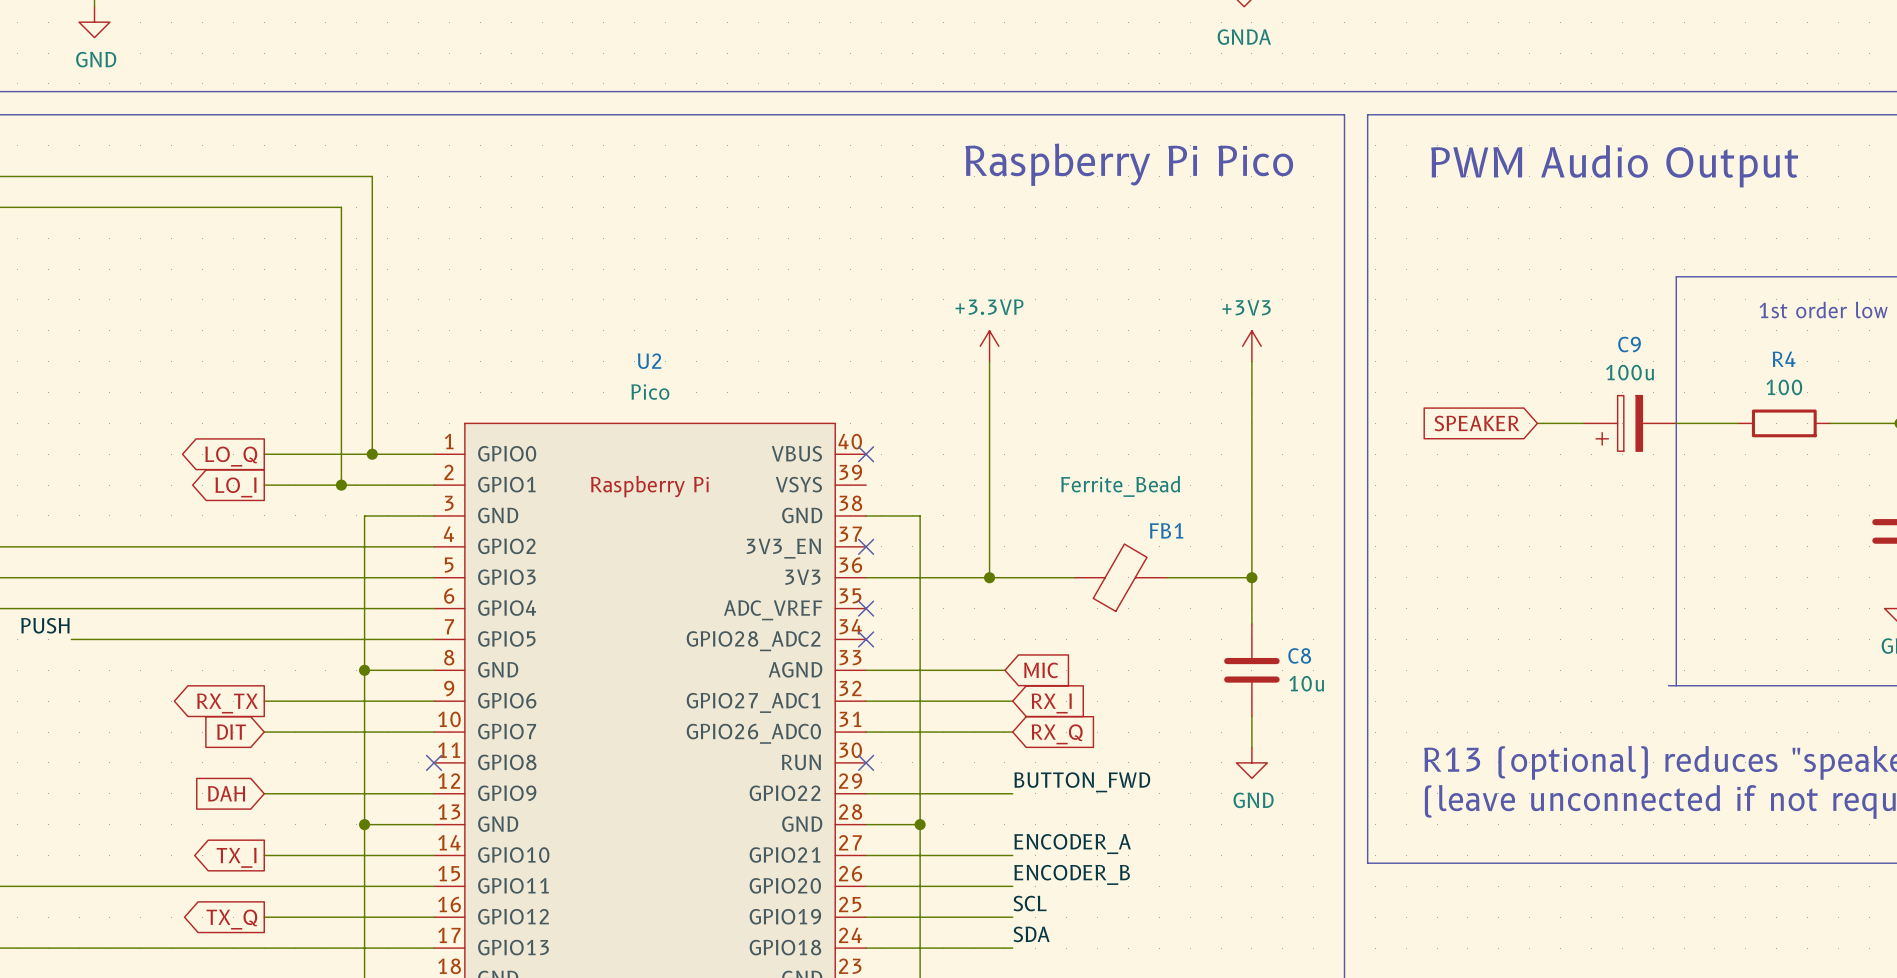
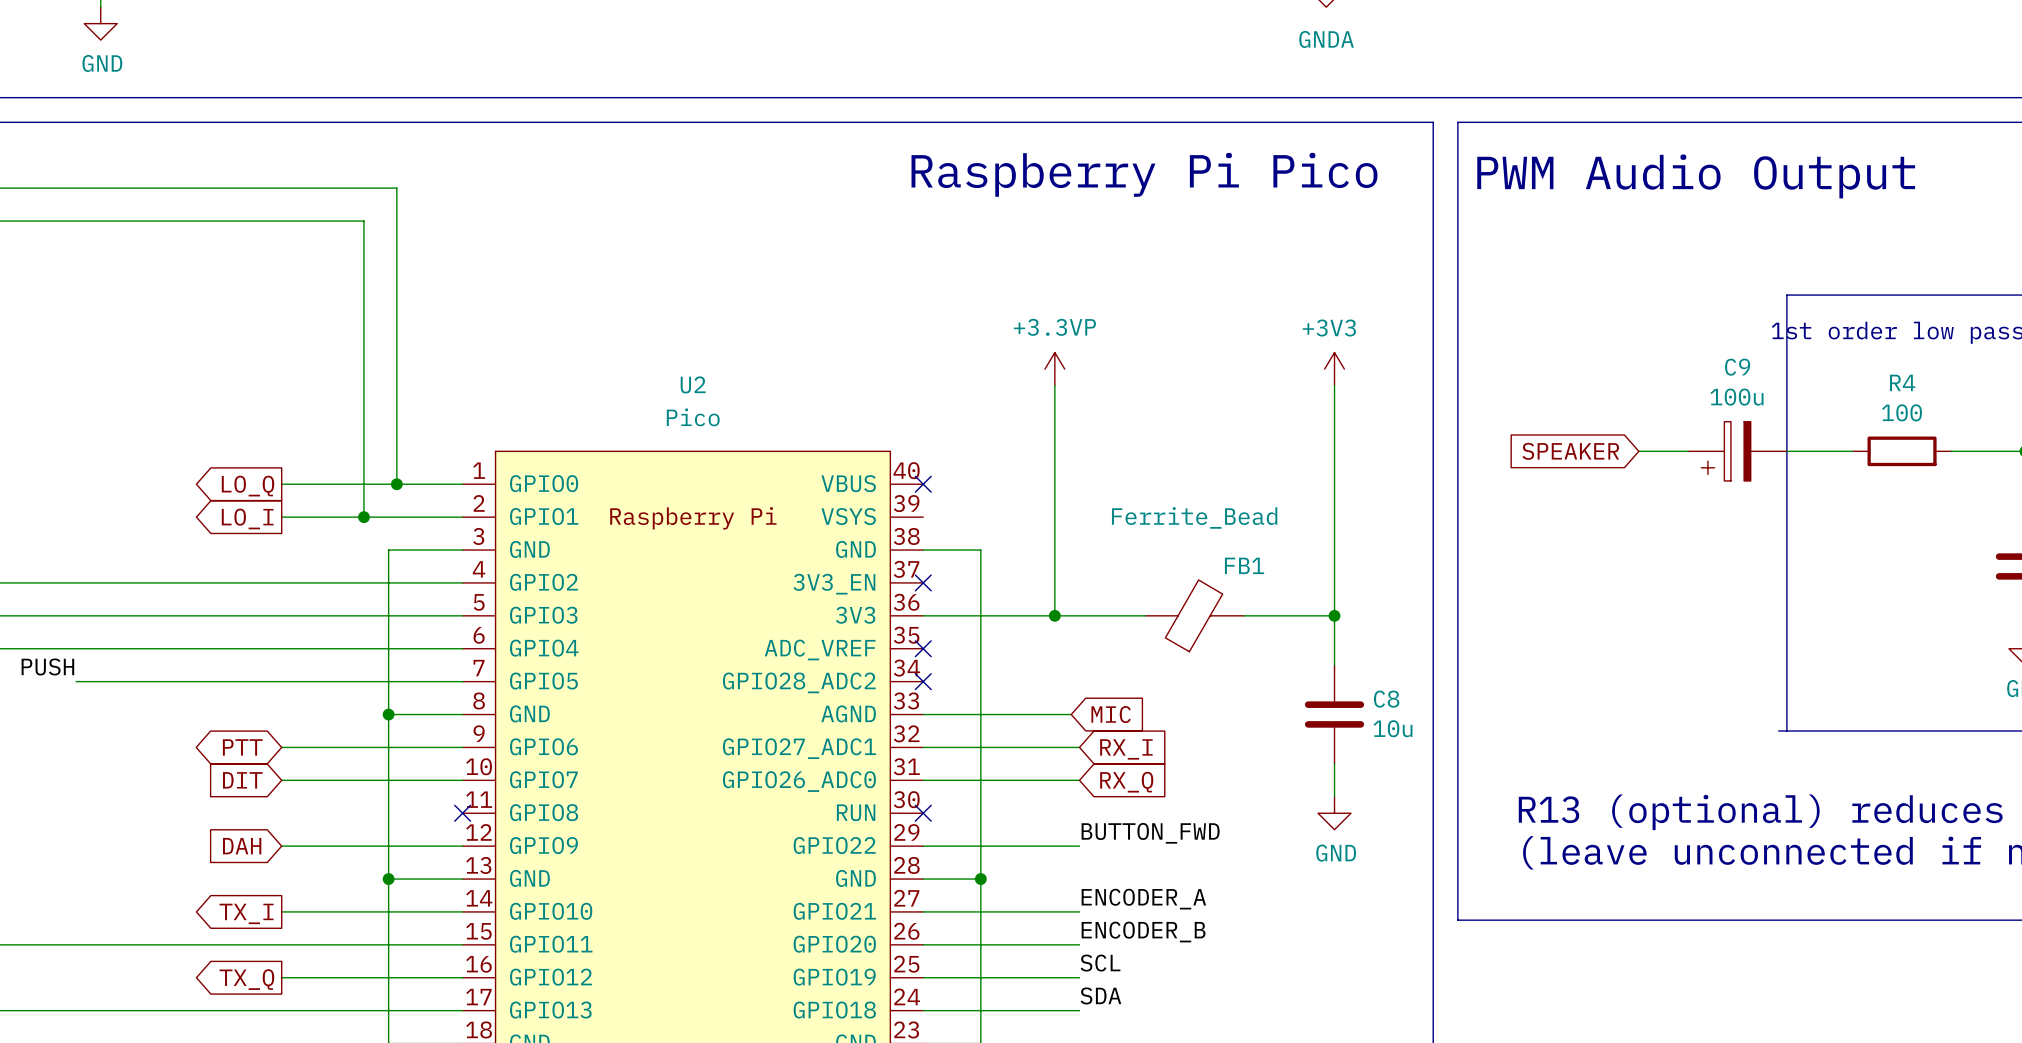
global label shape: output (227, 703) -> bidirectional (242, 747)
global label: RX_TX (227, 703) -> PTT (242, 747)

